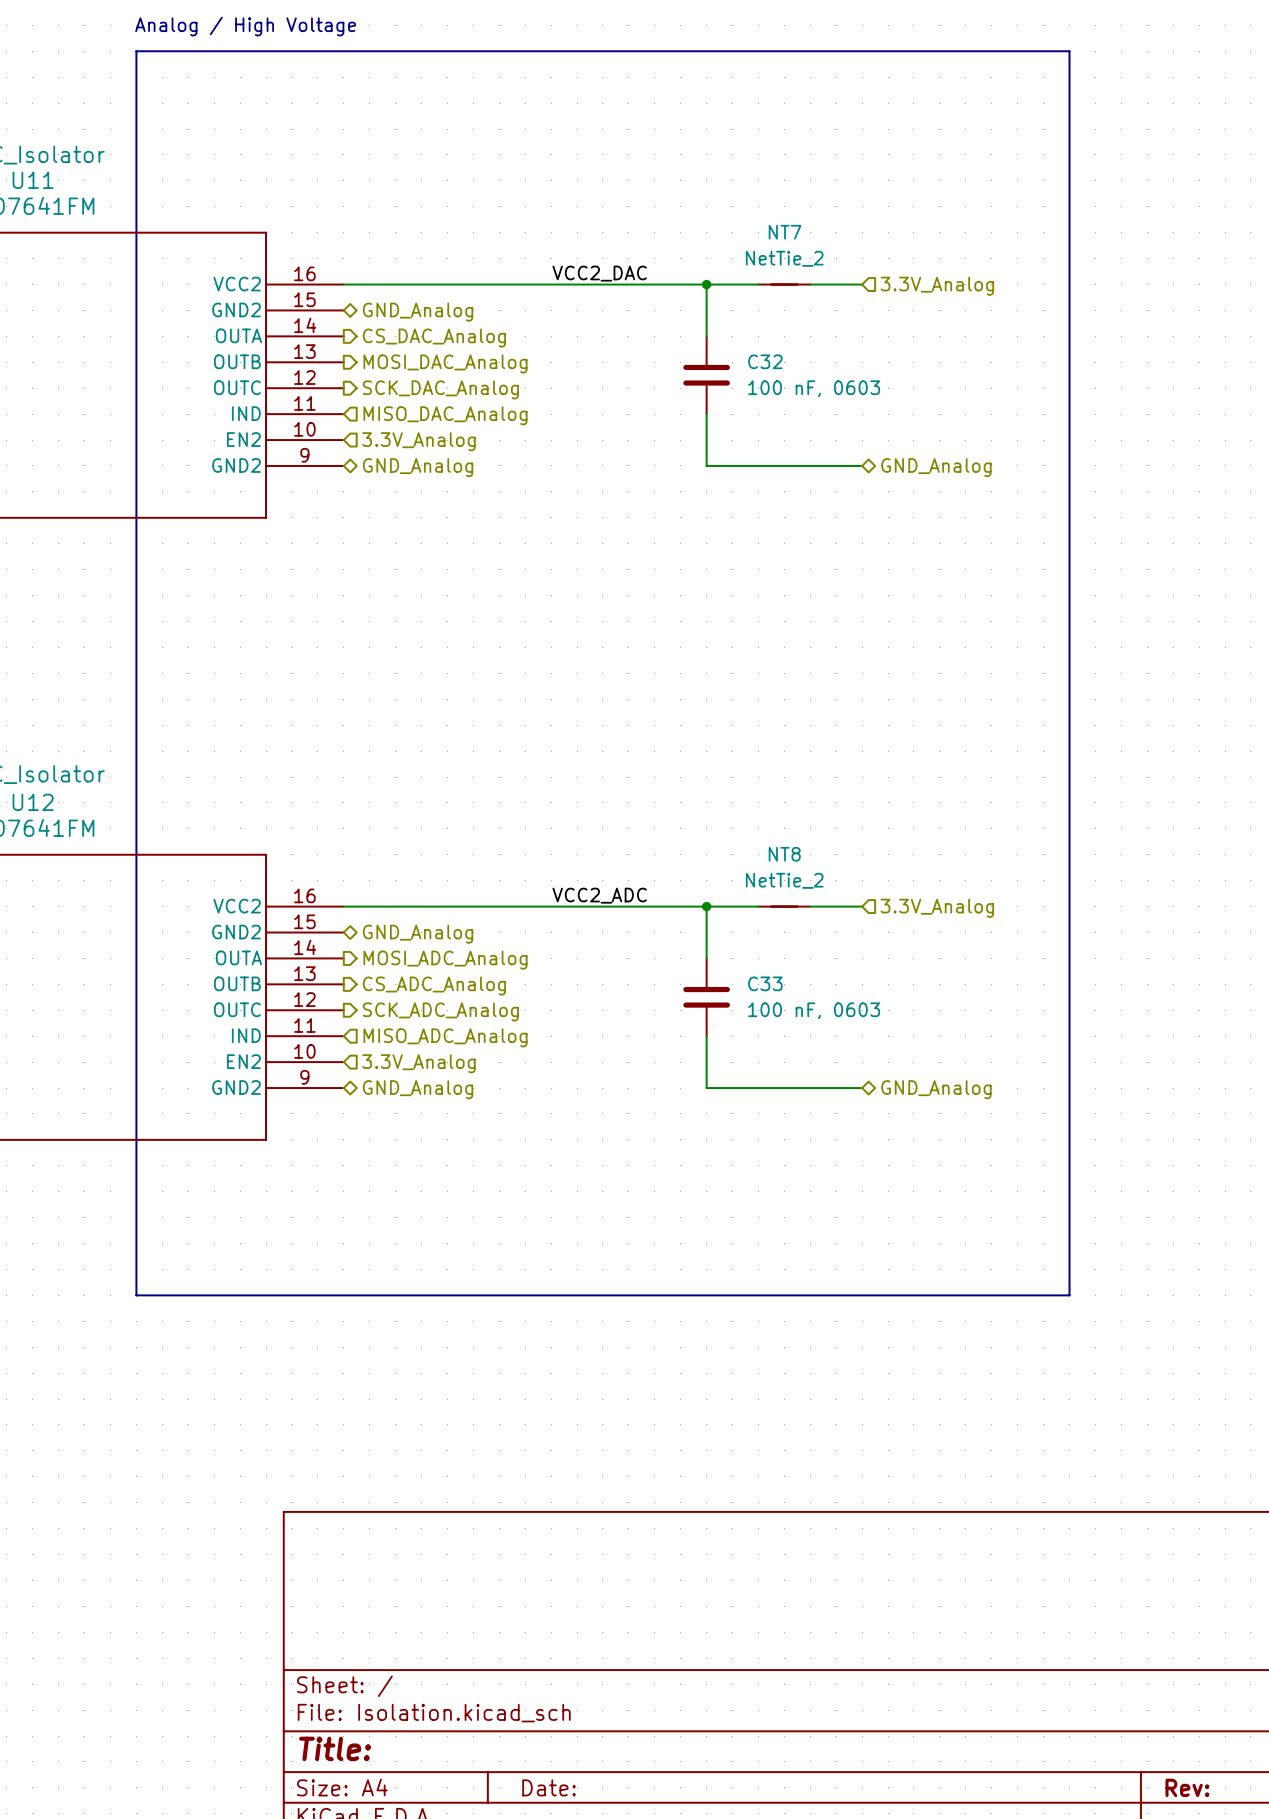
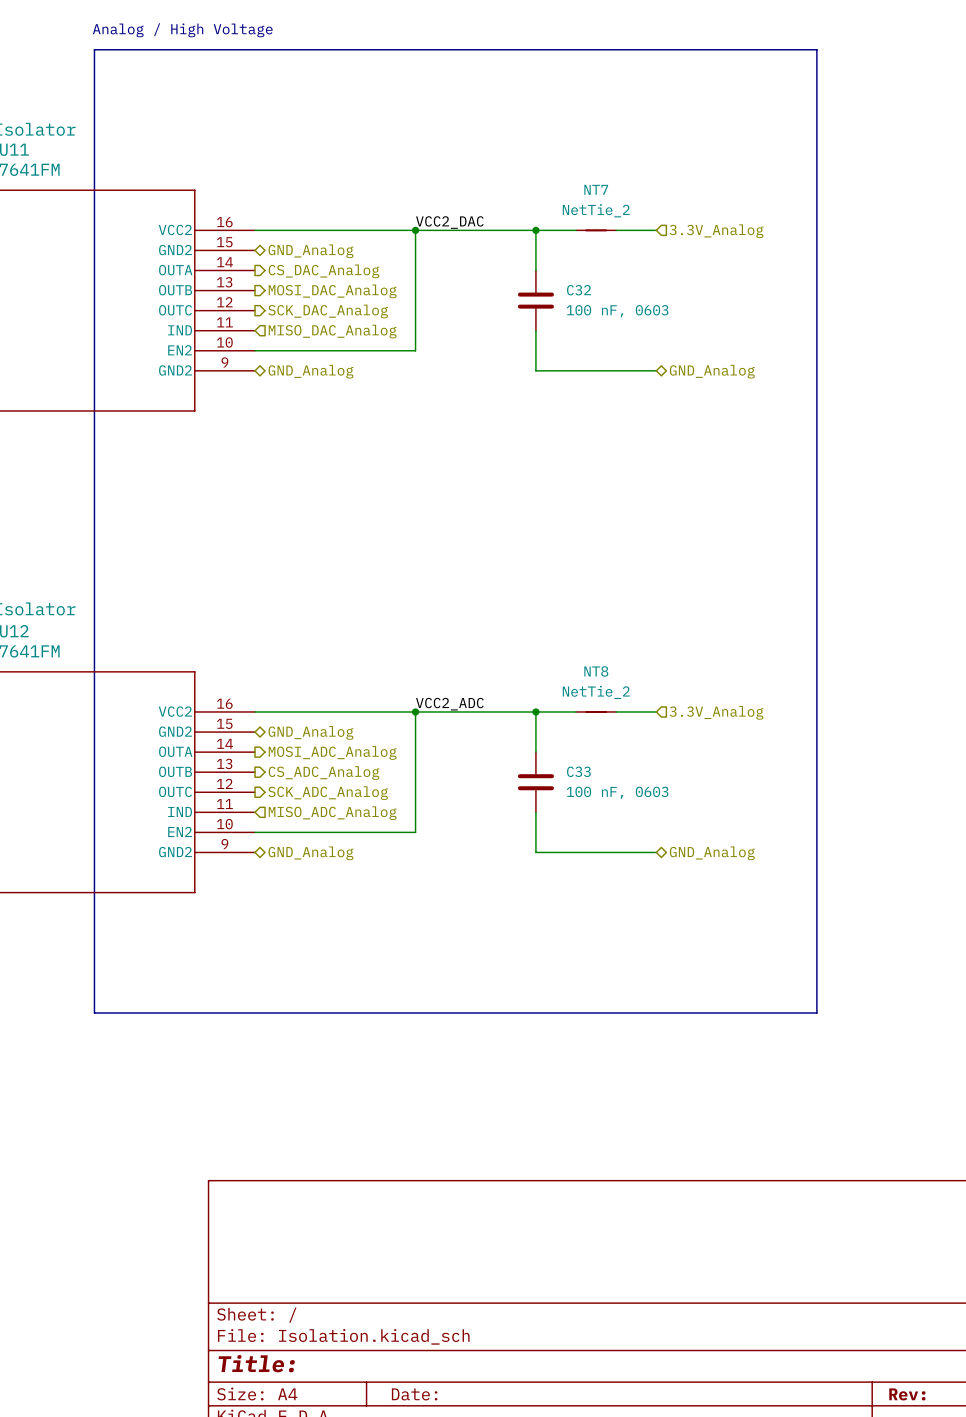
wire: none -> (415, 230) (415, 350) (254, 350)
junction: none -> (415, 230)
hierarchical label: 3.3V_Analog (418, 441) -> none
wire: none -> (415, 711) (415, 832) (254, 832)
junction: none -> (415, 711)
hierarchical label: 3.3V_Analog (418, 1063) -> none

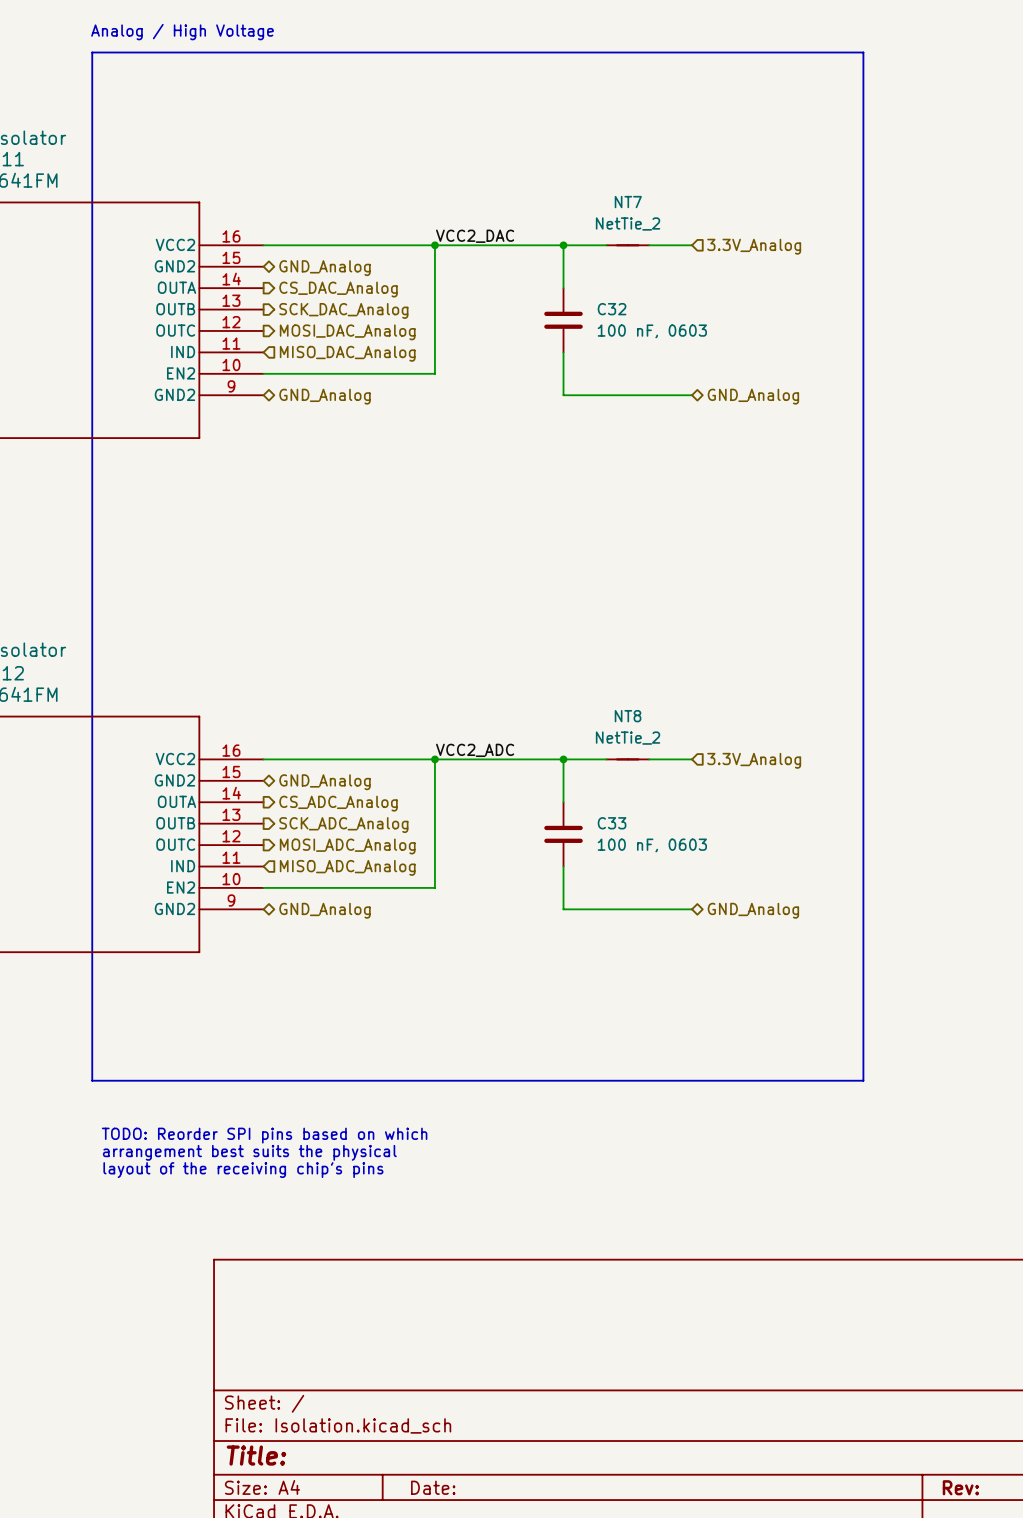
hierarchical label: MOSI_DAC_Analog (332, 291) -> SCK_DAC_Analog (343, 310)
hierarchical label: SCK_DAC_Analog (328, 311) -> MOSI_DAC_Analog (347, 332)
hierarchical label: MOSI_ADC_Analog (332, 752) -> CS_ADC_Analog (338, 803)
hierarchical label: CS_ADC_Analog (324, 773) -> SCK_ADC_Analog (343, 825)
hierarchical label: SCK_ADC_Analog (328, 793) -> MOSI_ADC_Analog (347, 846)
text: none -> TODO: Reorder SPI pins based on which (264, 1135)
text: none -> arrangement best suits the physical (249, 1152)
text: none -> layout of the receiving chip's pins (243, 1170)

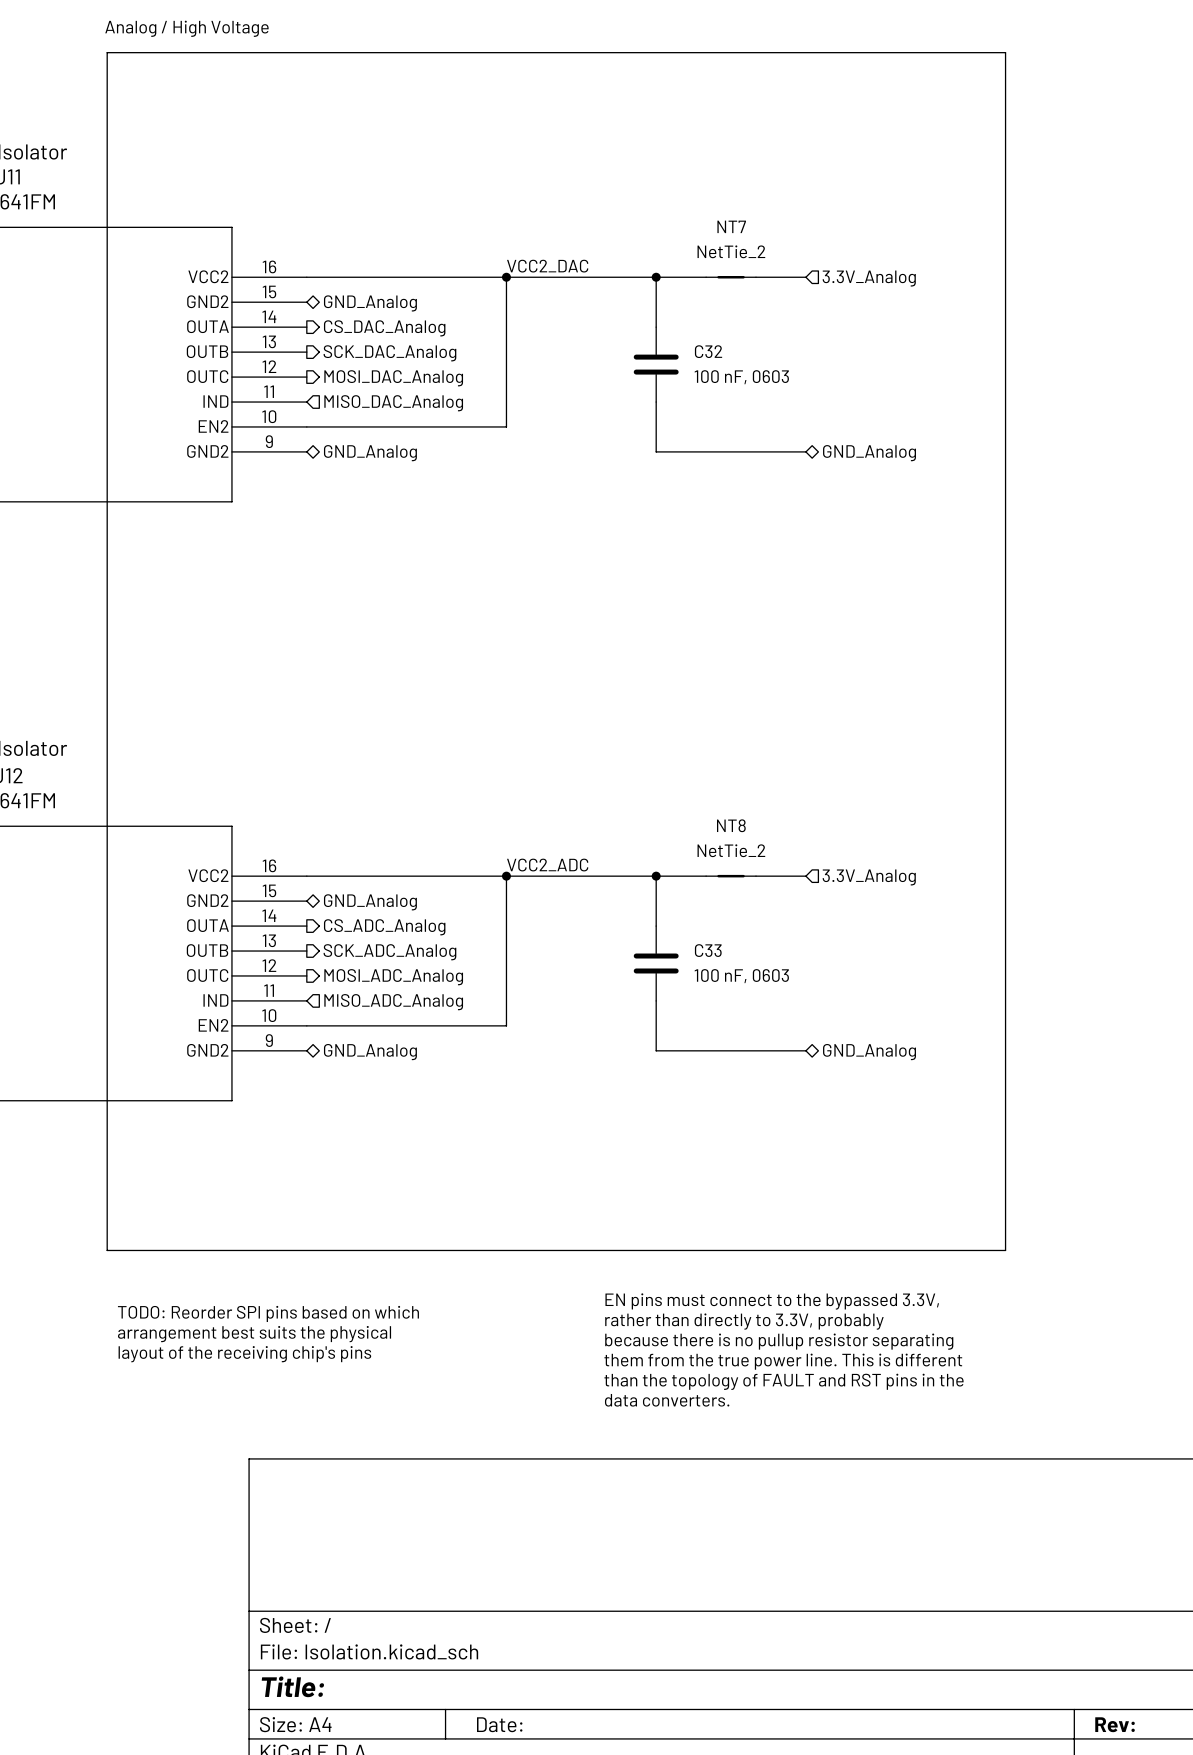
text: none -> EN pins must connect to the bypassed 3.3V, (772, 1301)
text: none -> rather than directly to 3.3V, probably (744, 1321)
text: none -> because there is no pullup resistor separating (779, 1341)
text: none -> them from the true power line. This is different (783, 1361)
text: none -> than the topology of FAULT and RST pins in the (783, 1381)
text: none -> data converters. (667, 1400)

